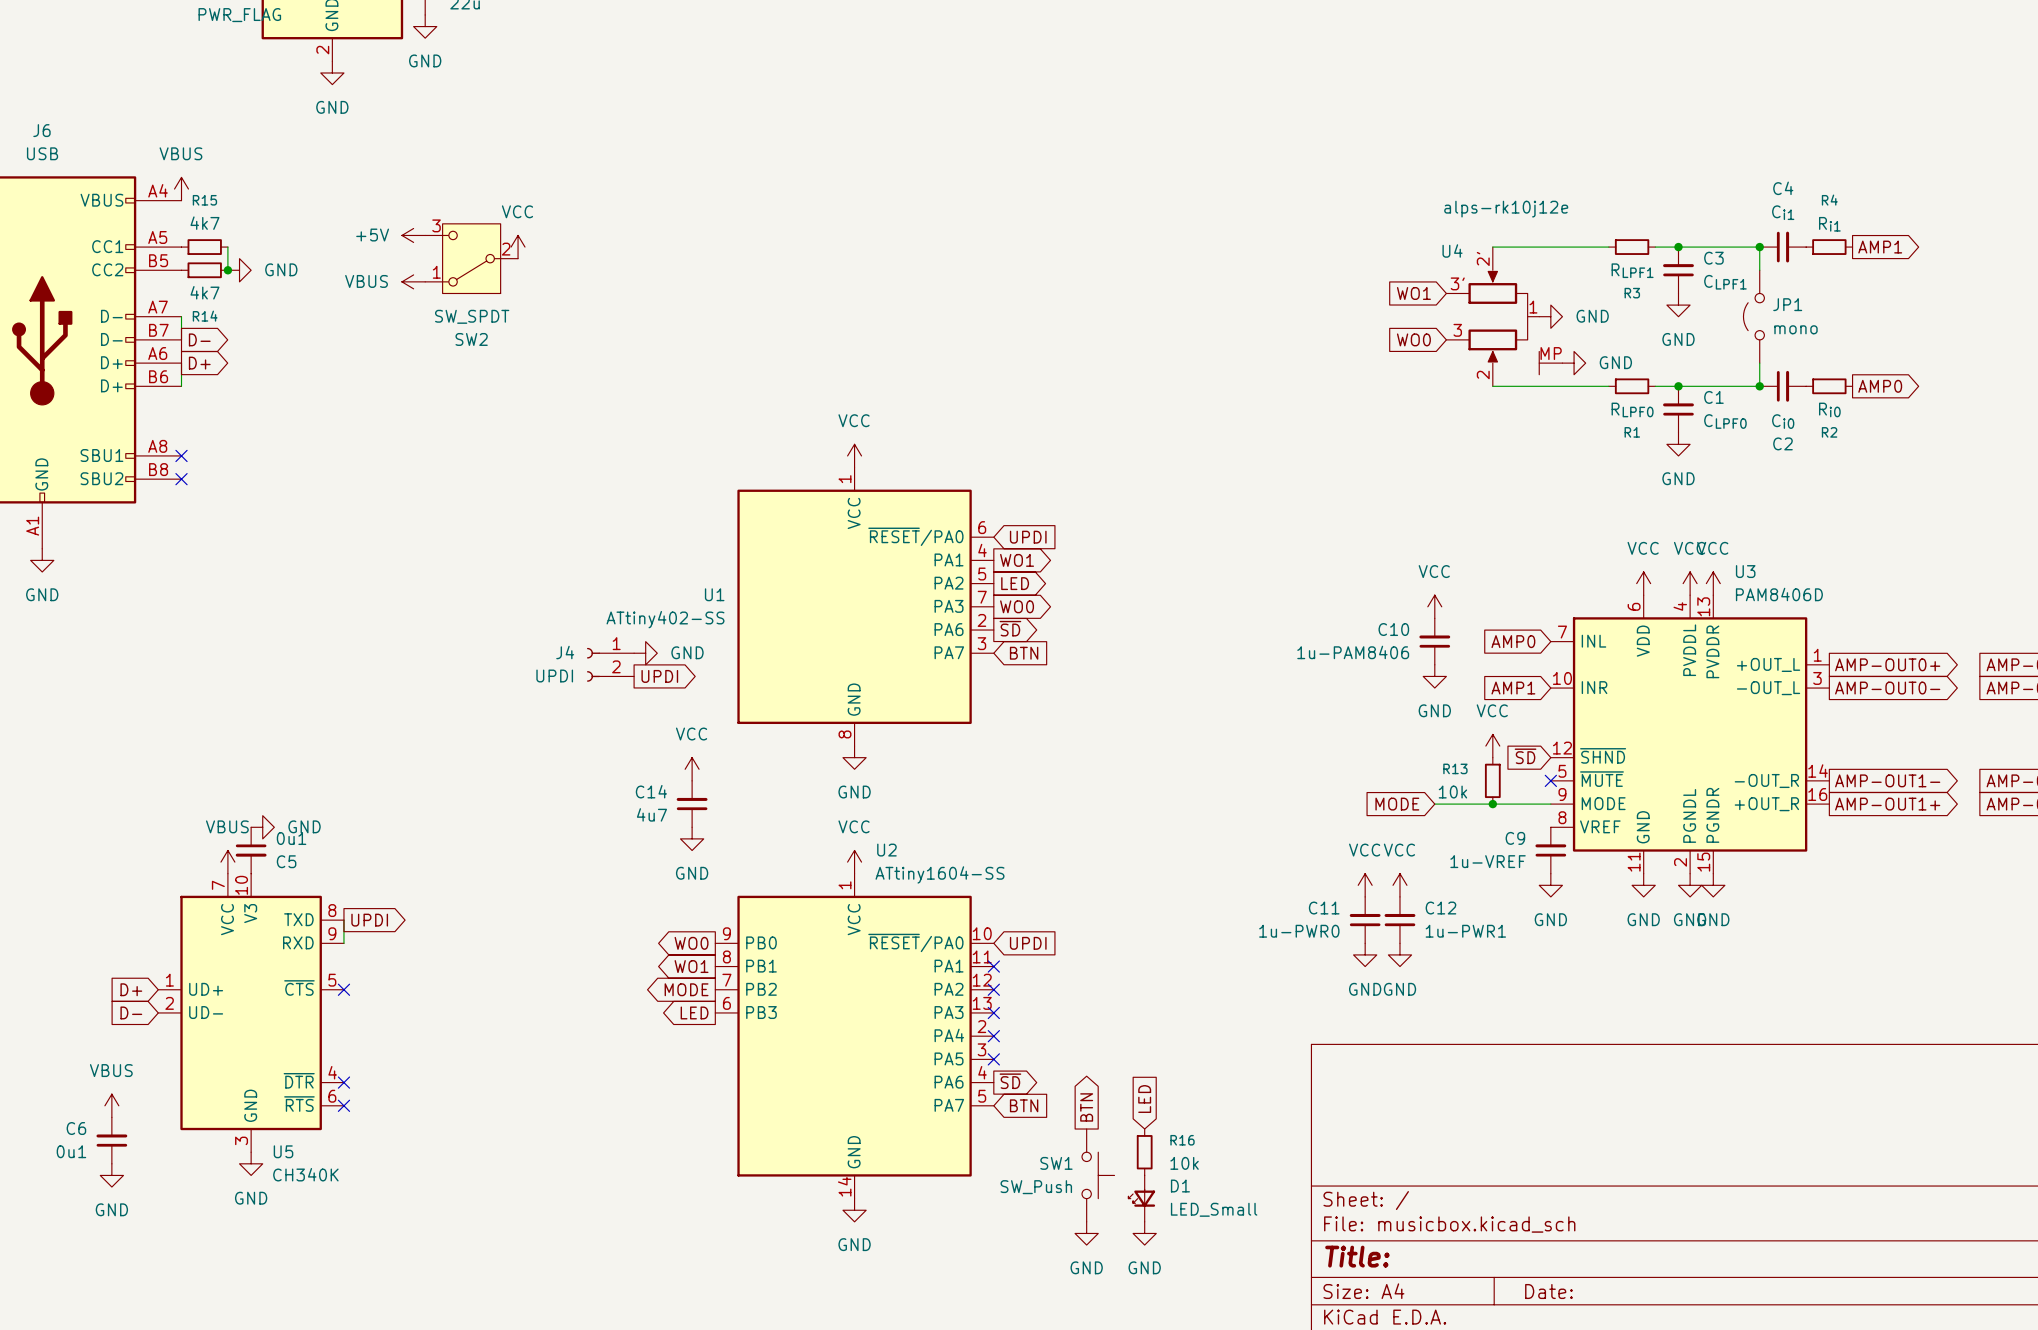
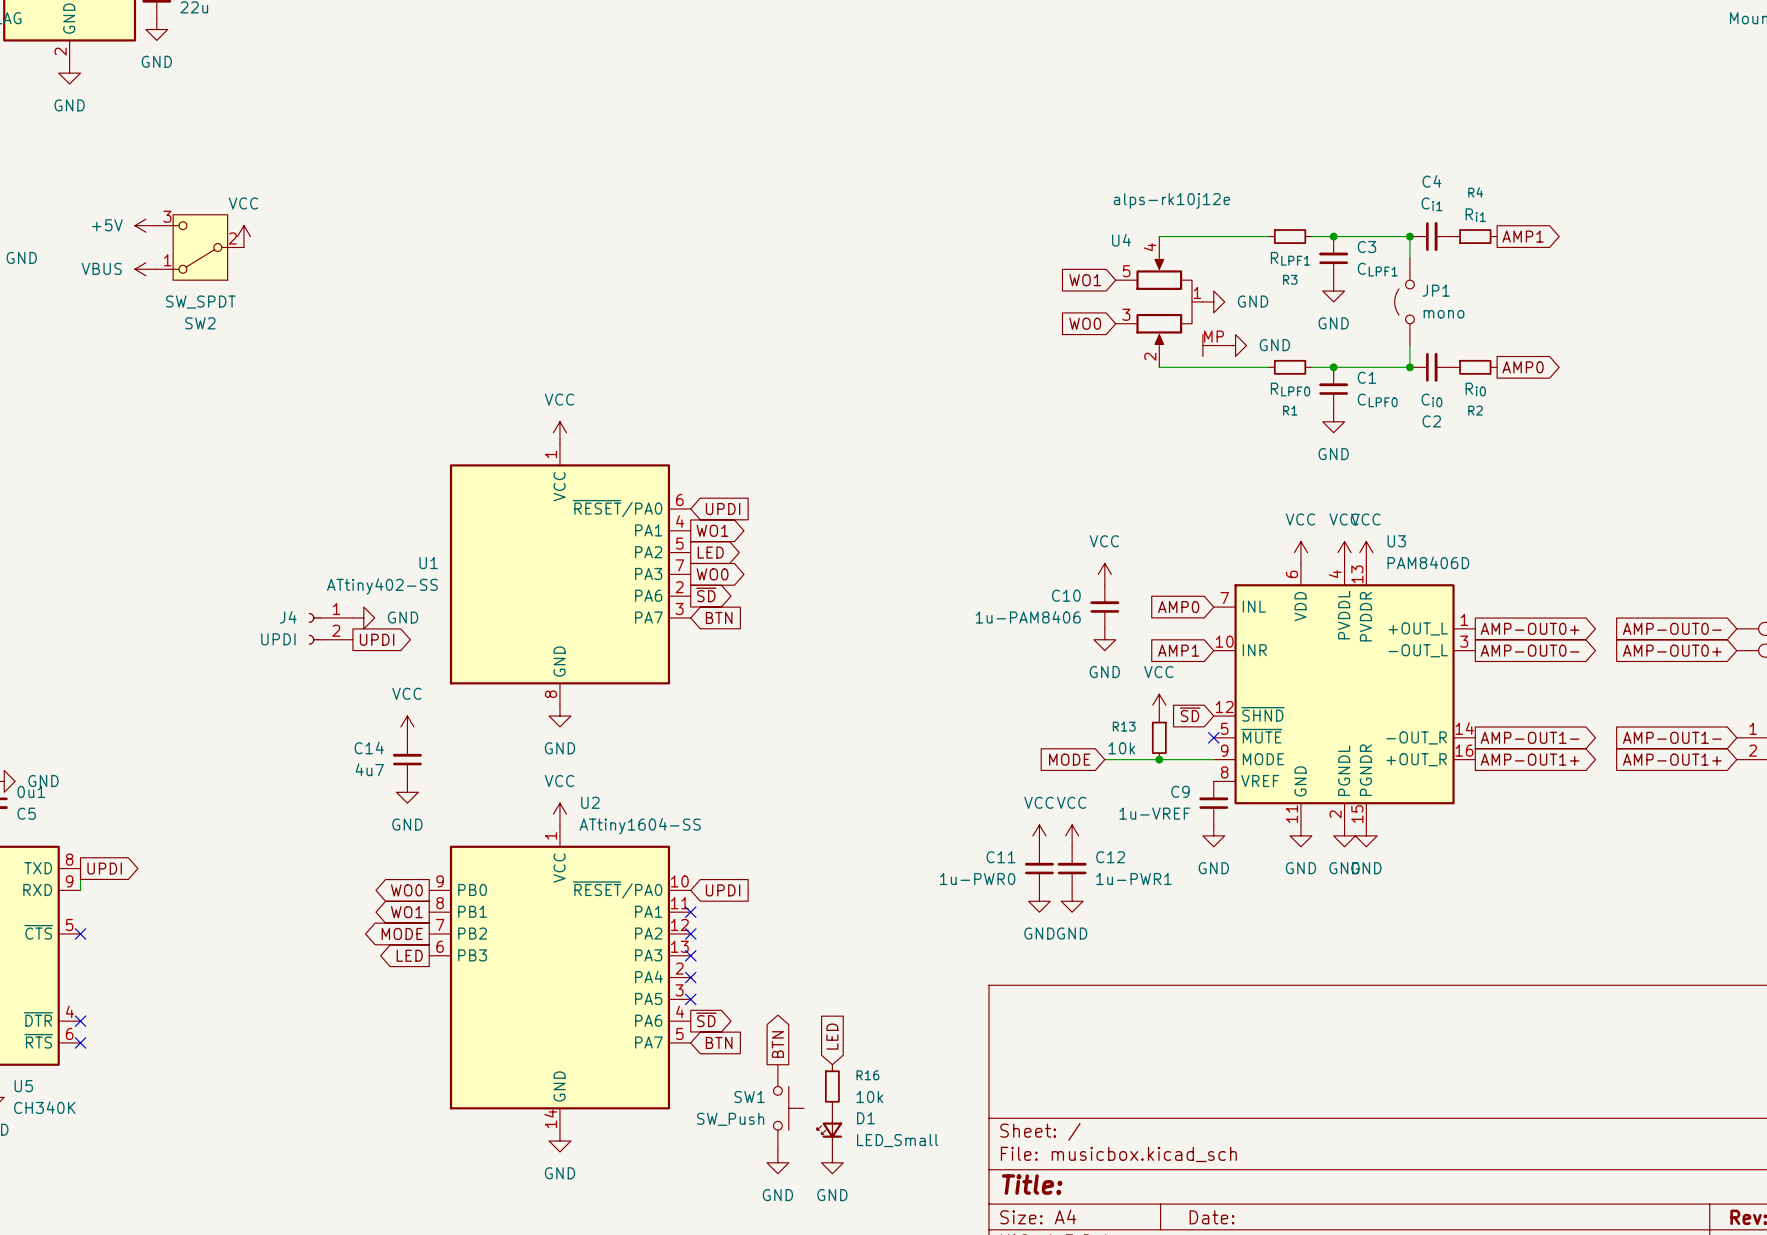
U4 pin number: 2' (1483, 258) -> 4 (1150, 247)
U4 pin number: 3' (1457, 283) -> 5 (1126, 271)

